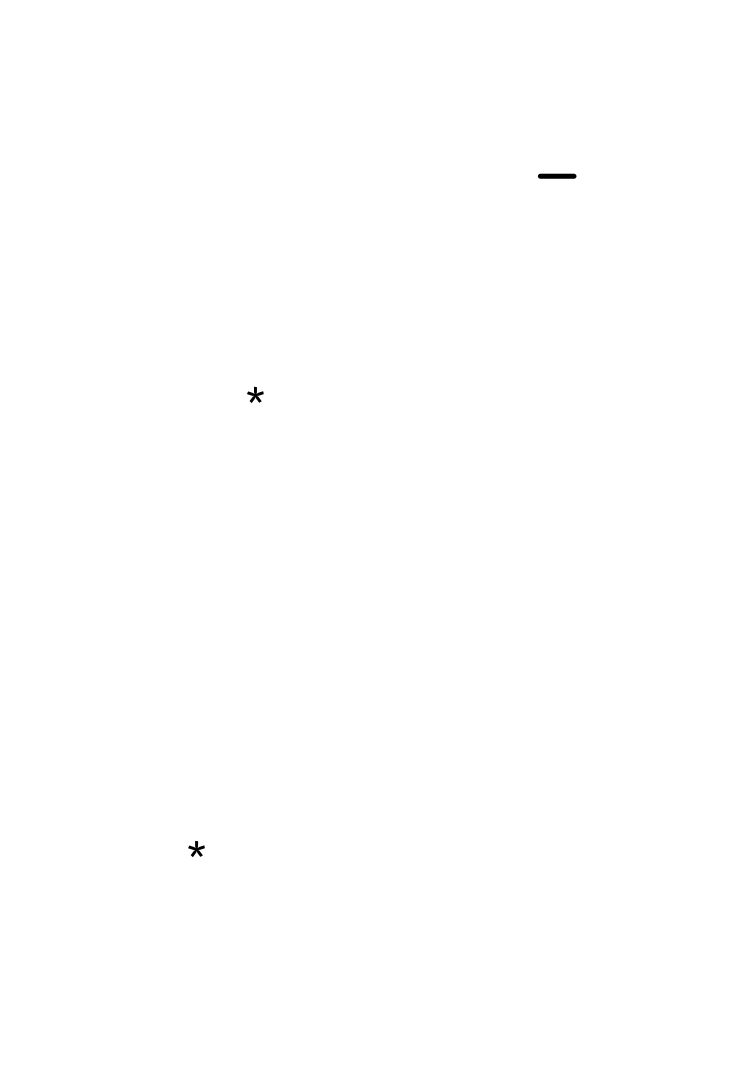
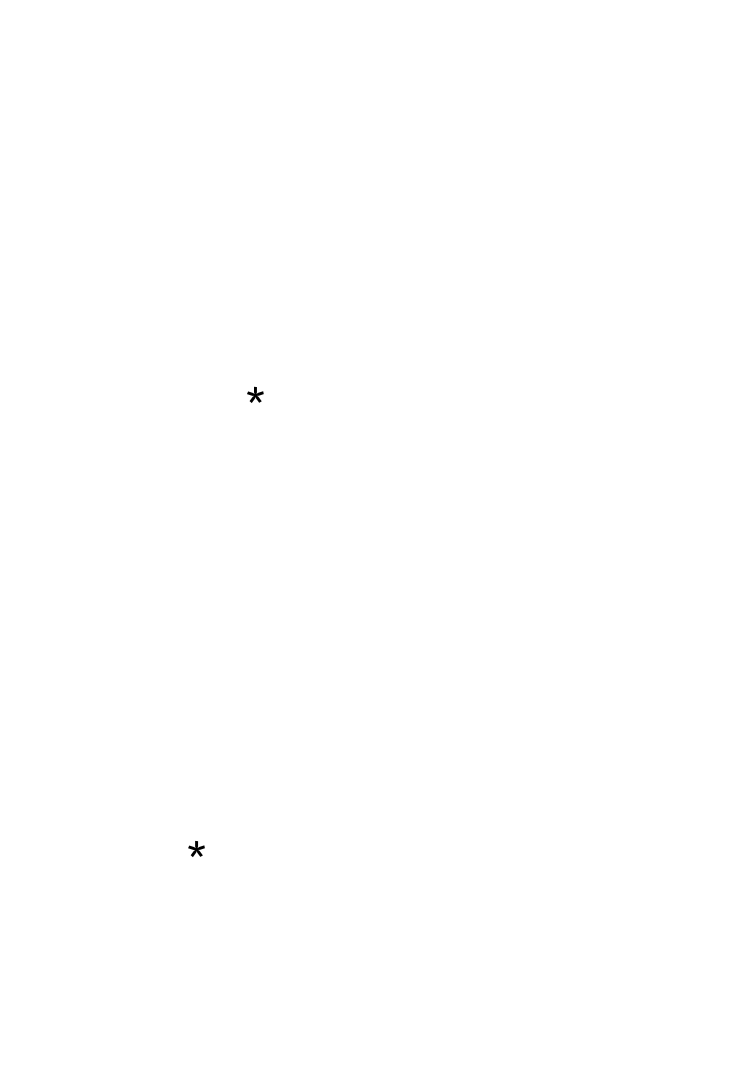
line: (540, 176) (574, 176) -> none

